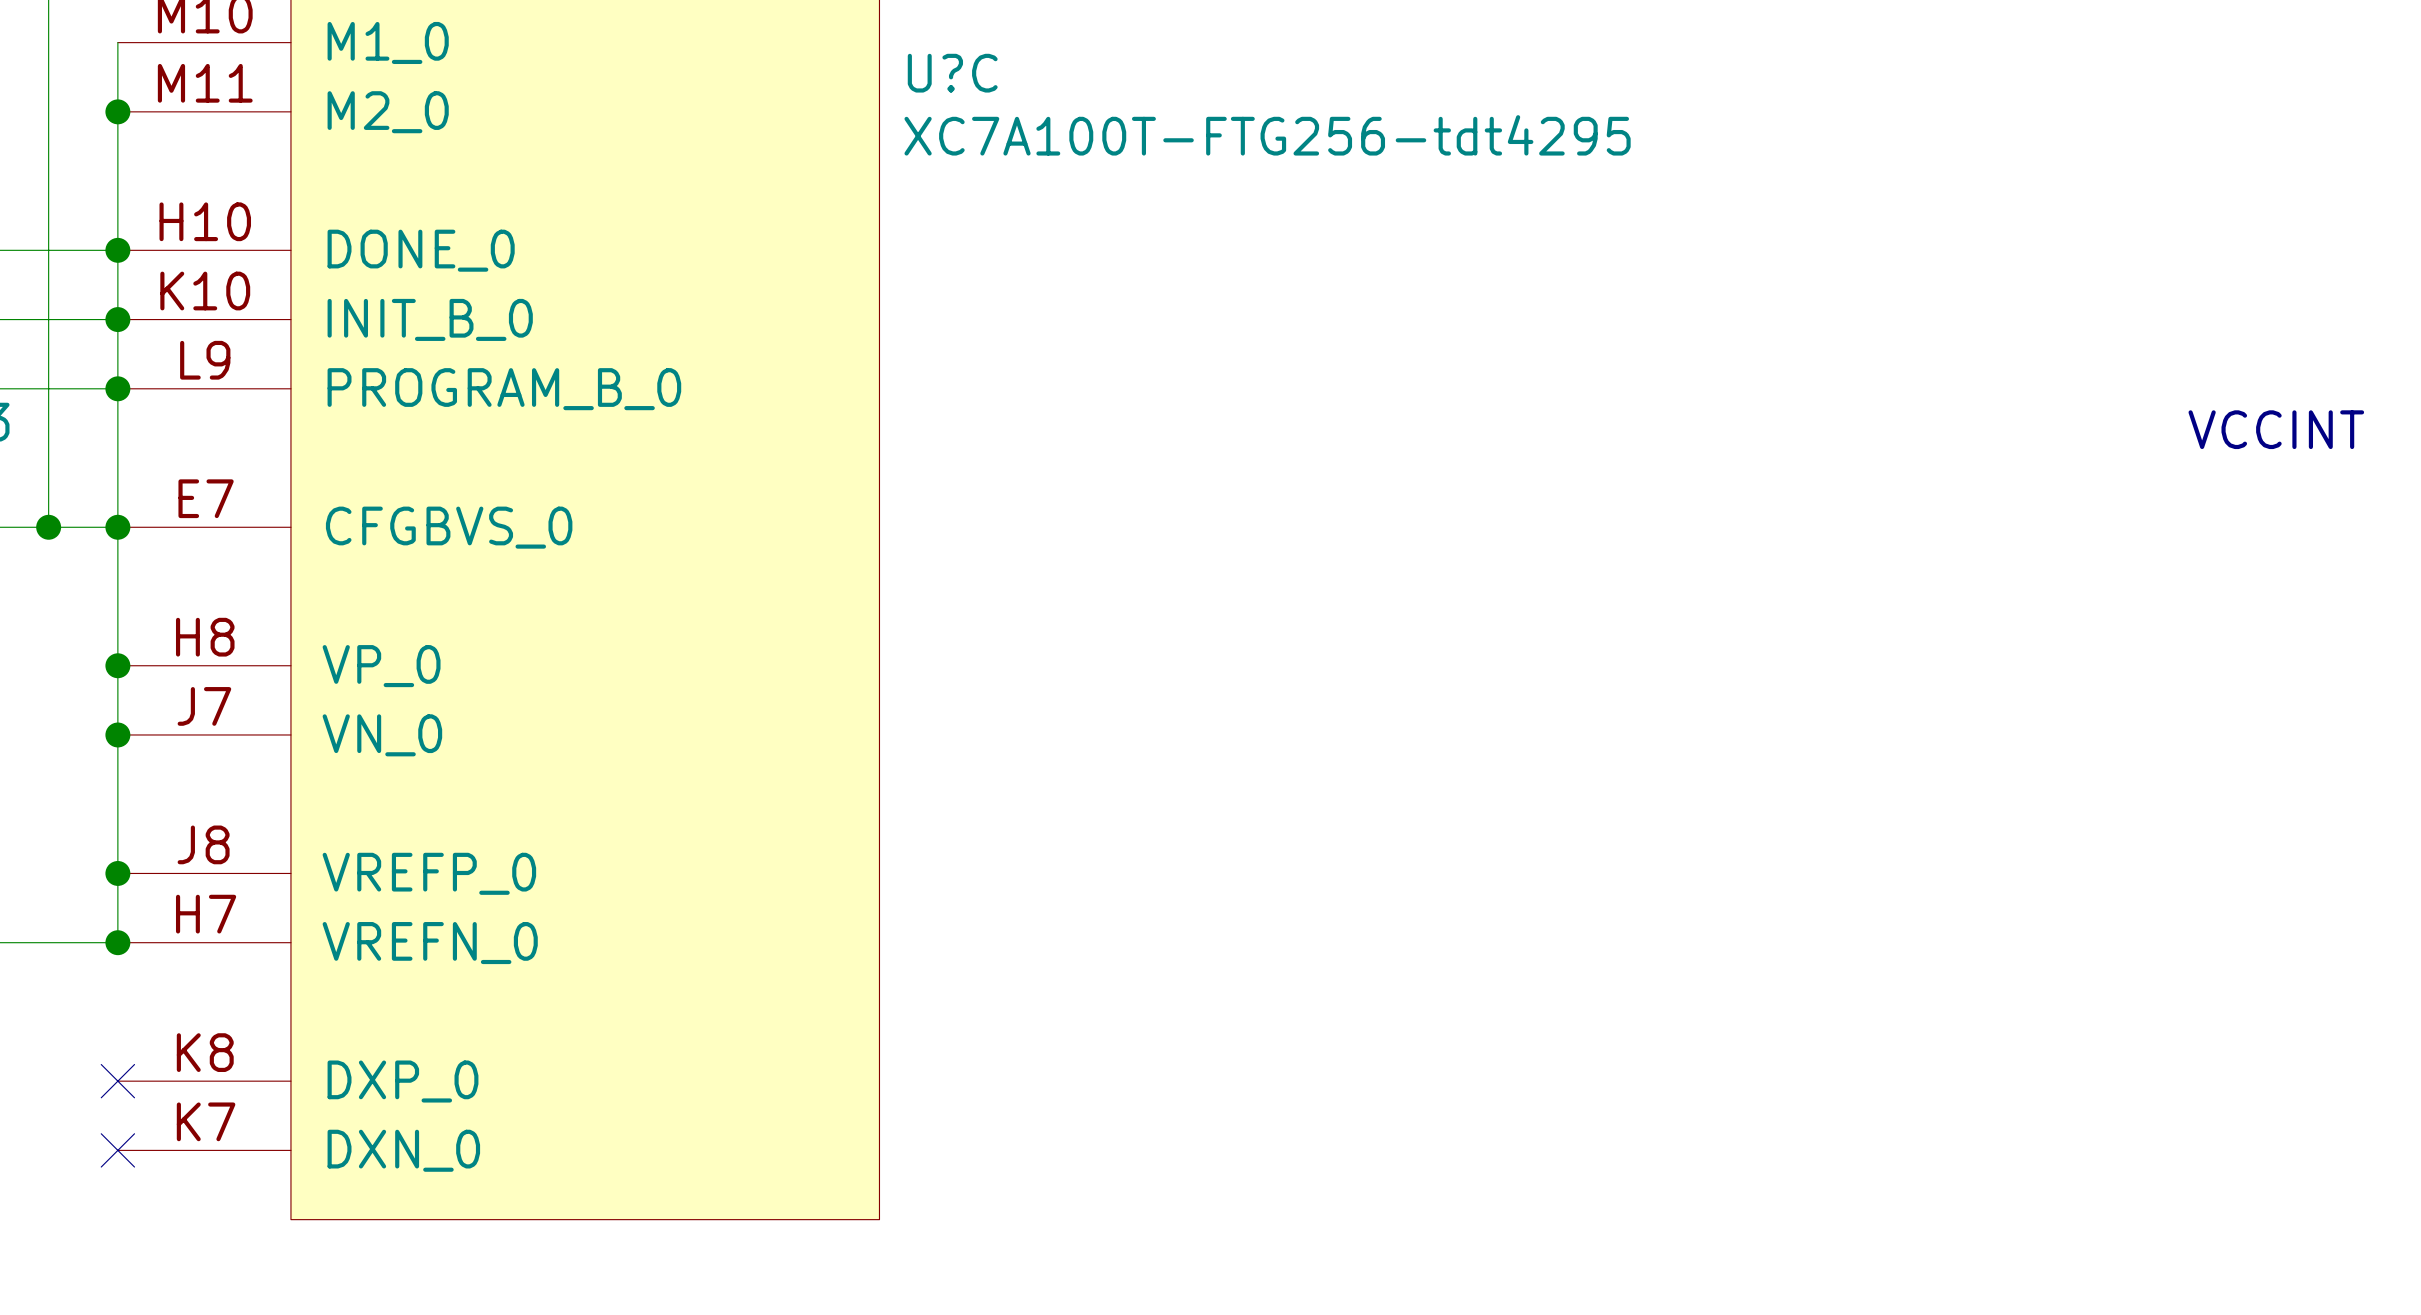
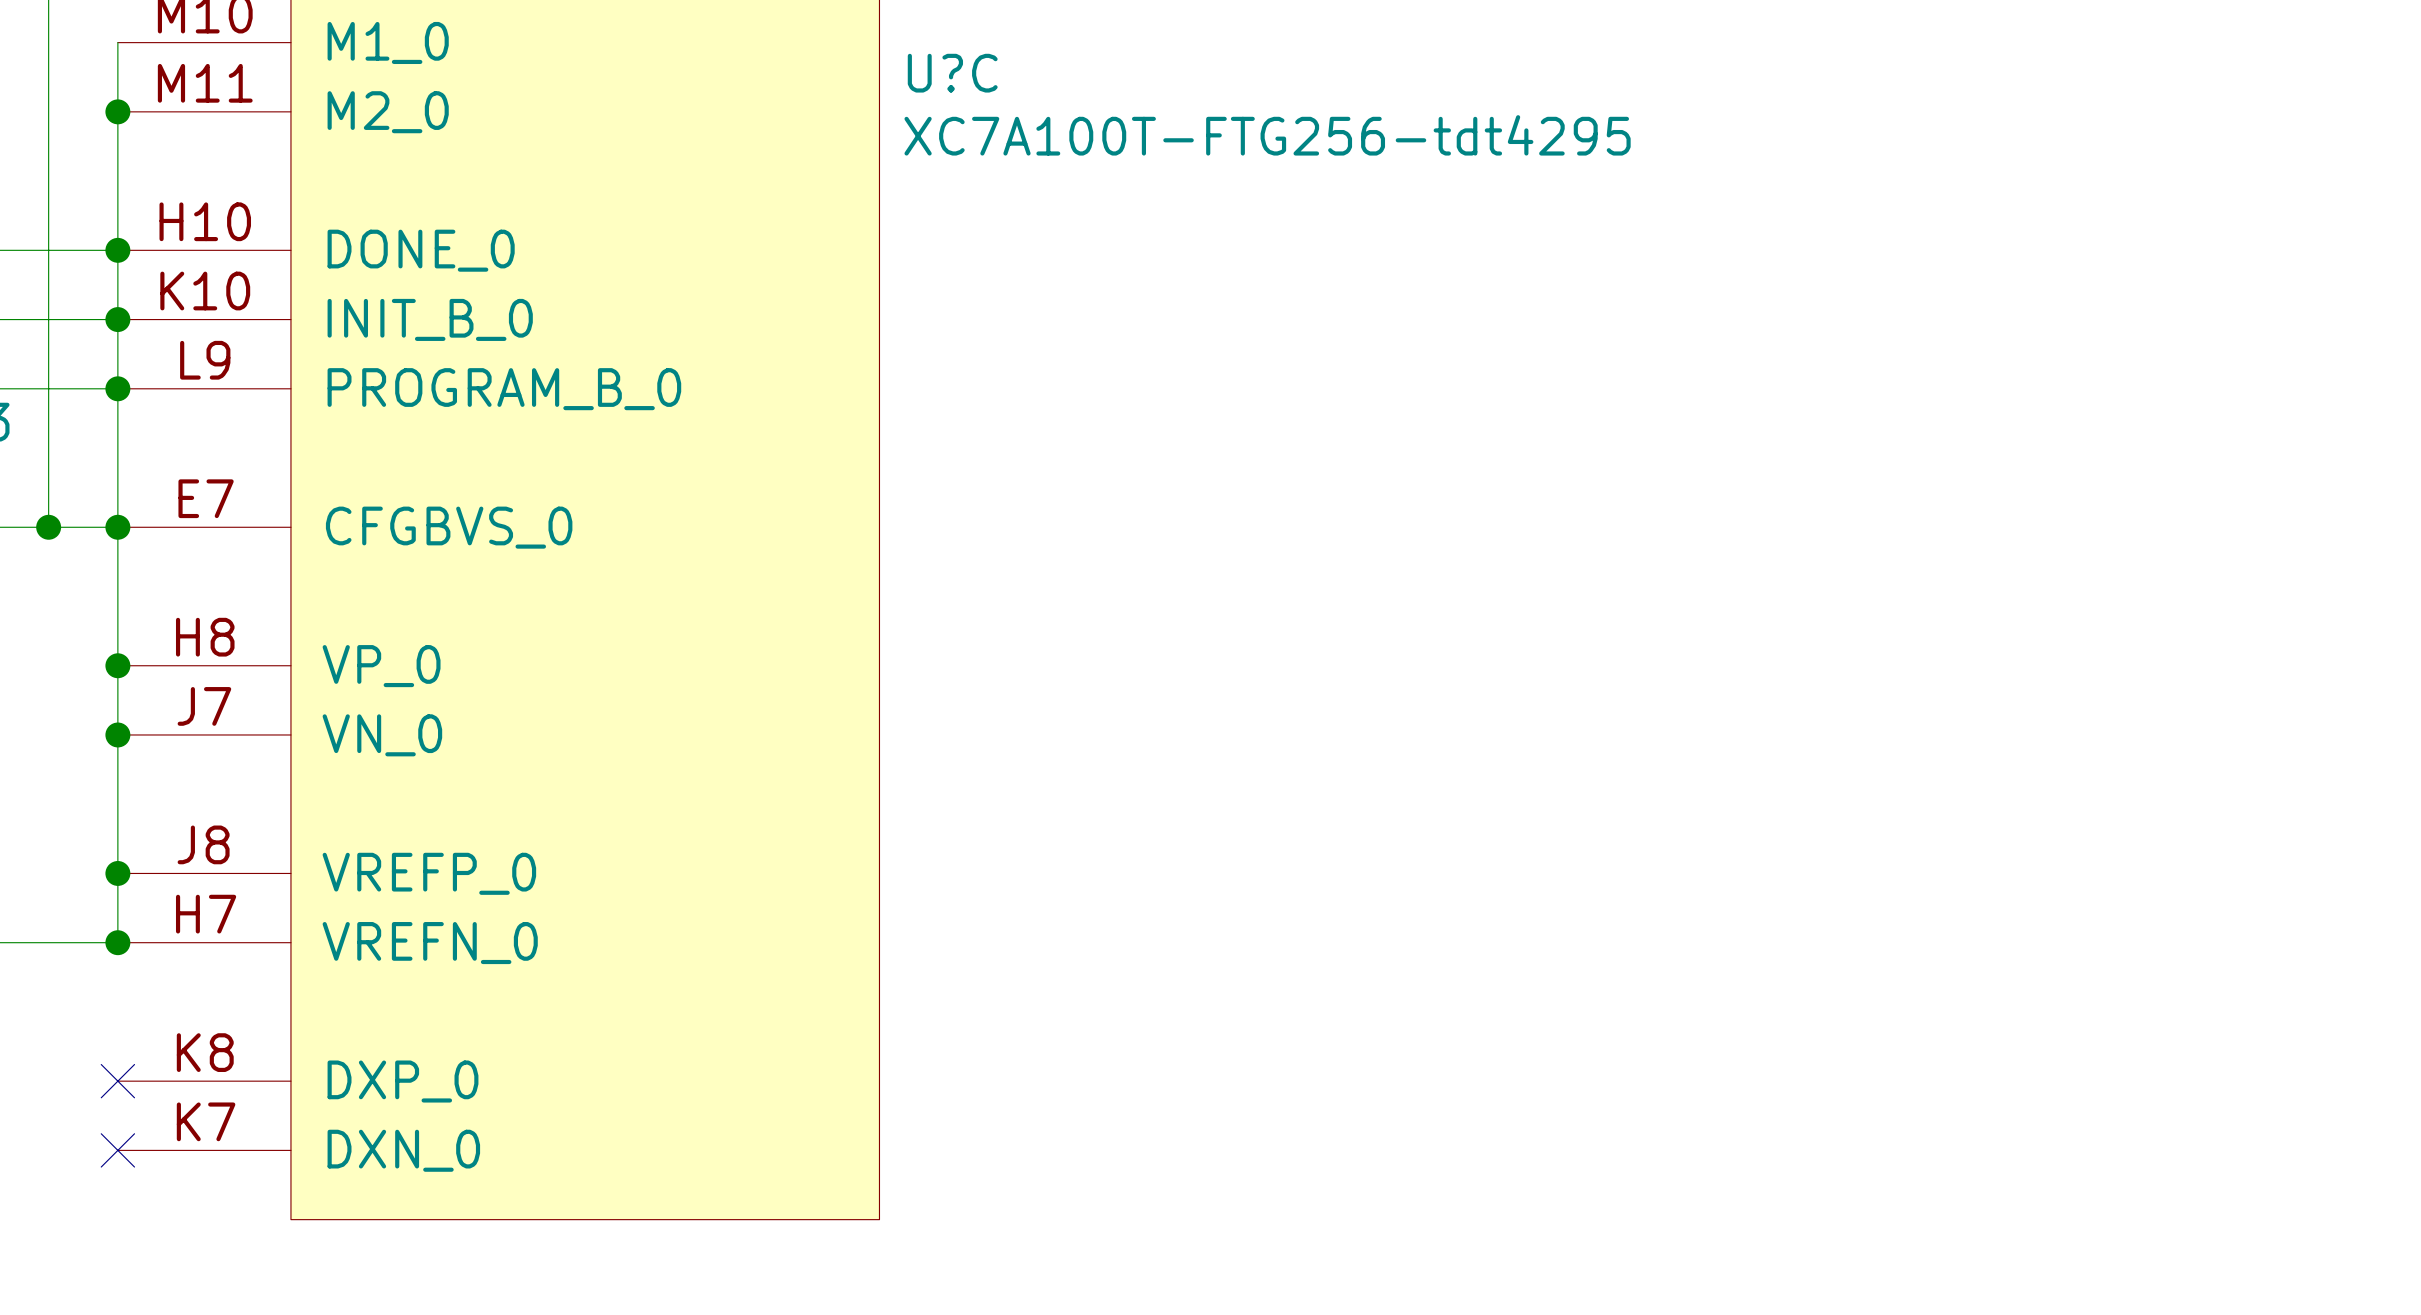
text: VCCINT (2276, 429) -> none

